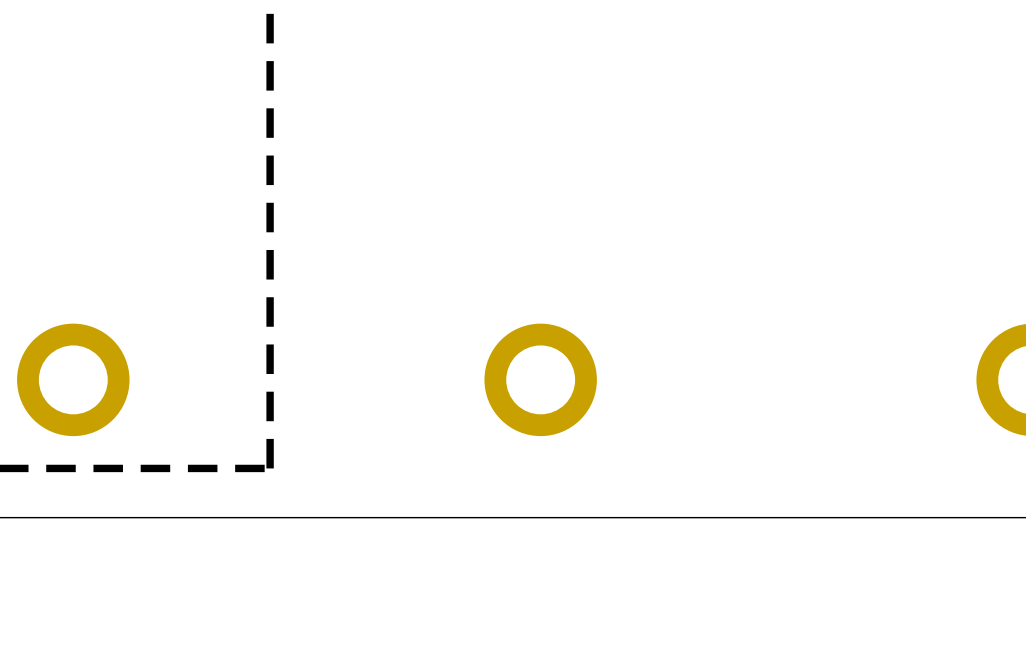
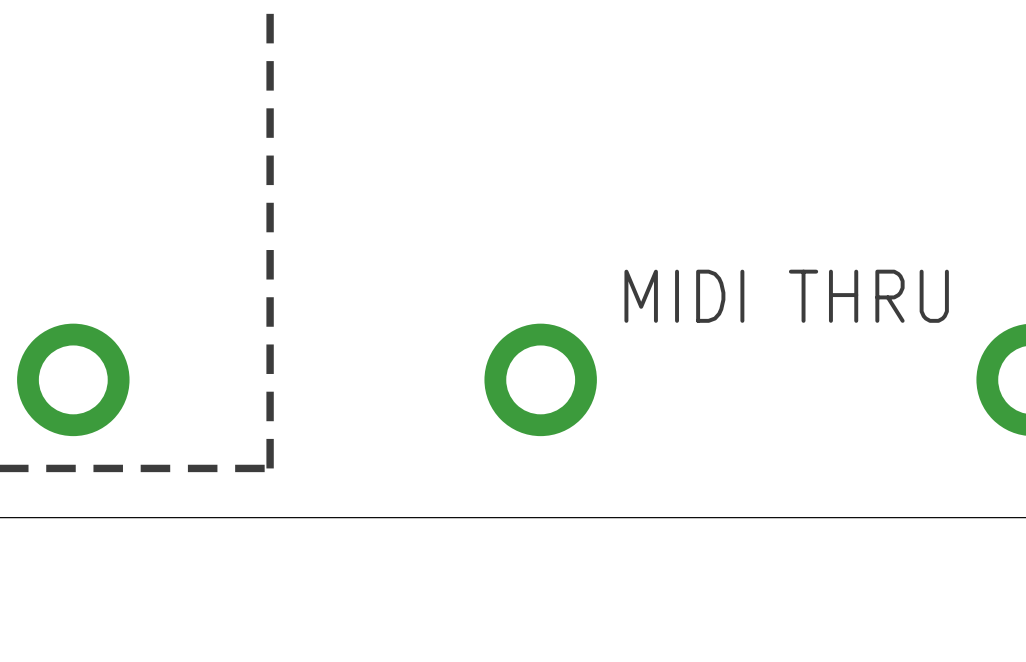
text: none -> MIDI THRU (786, 296)

